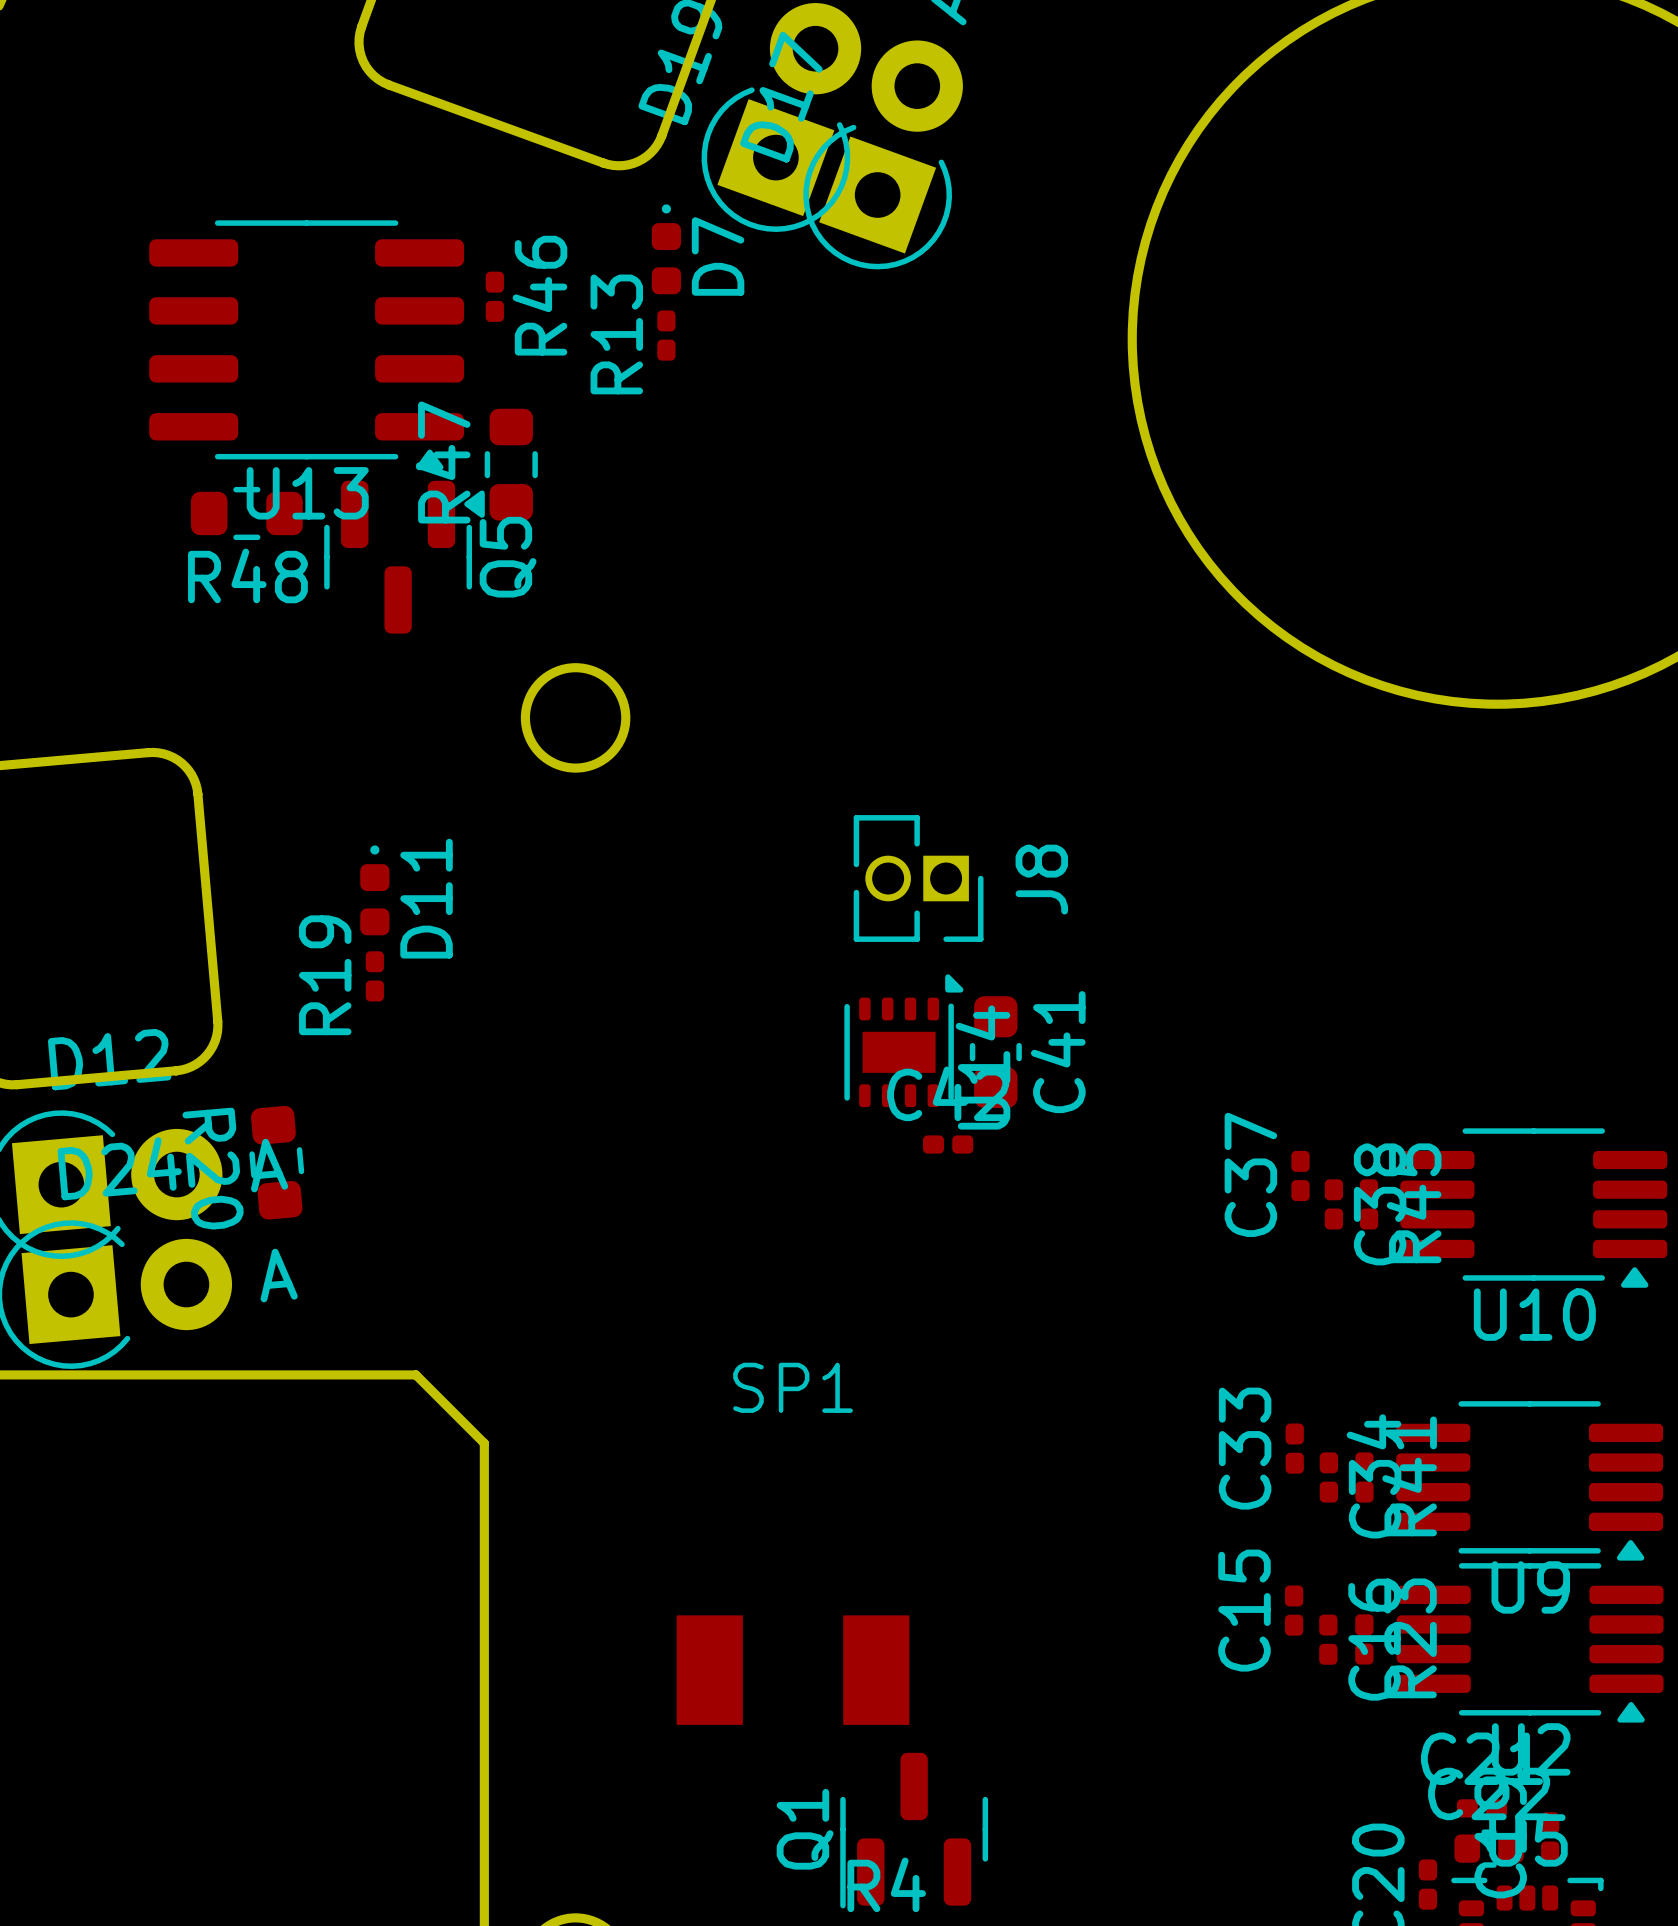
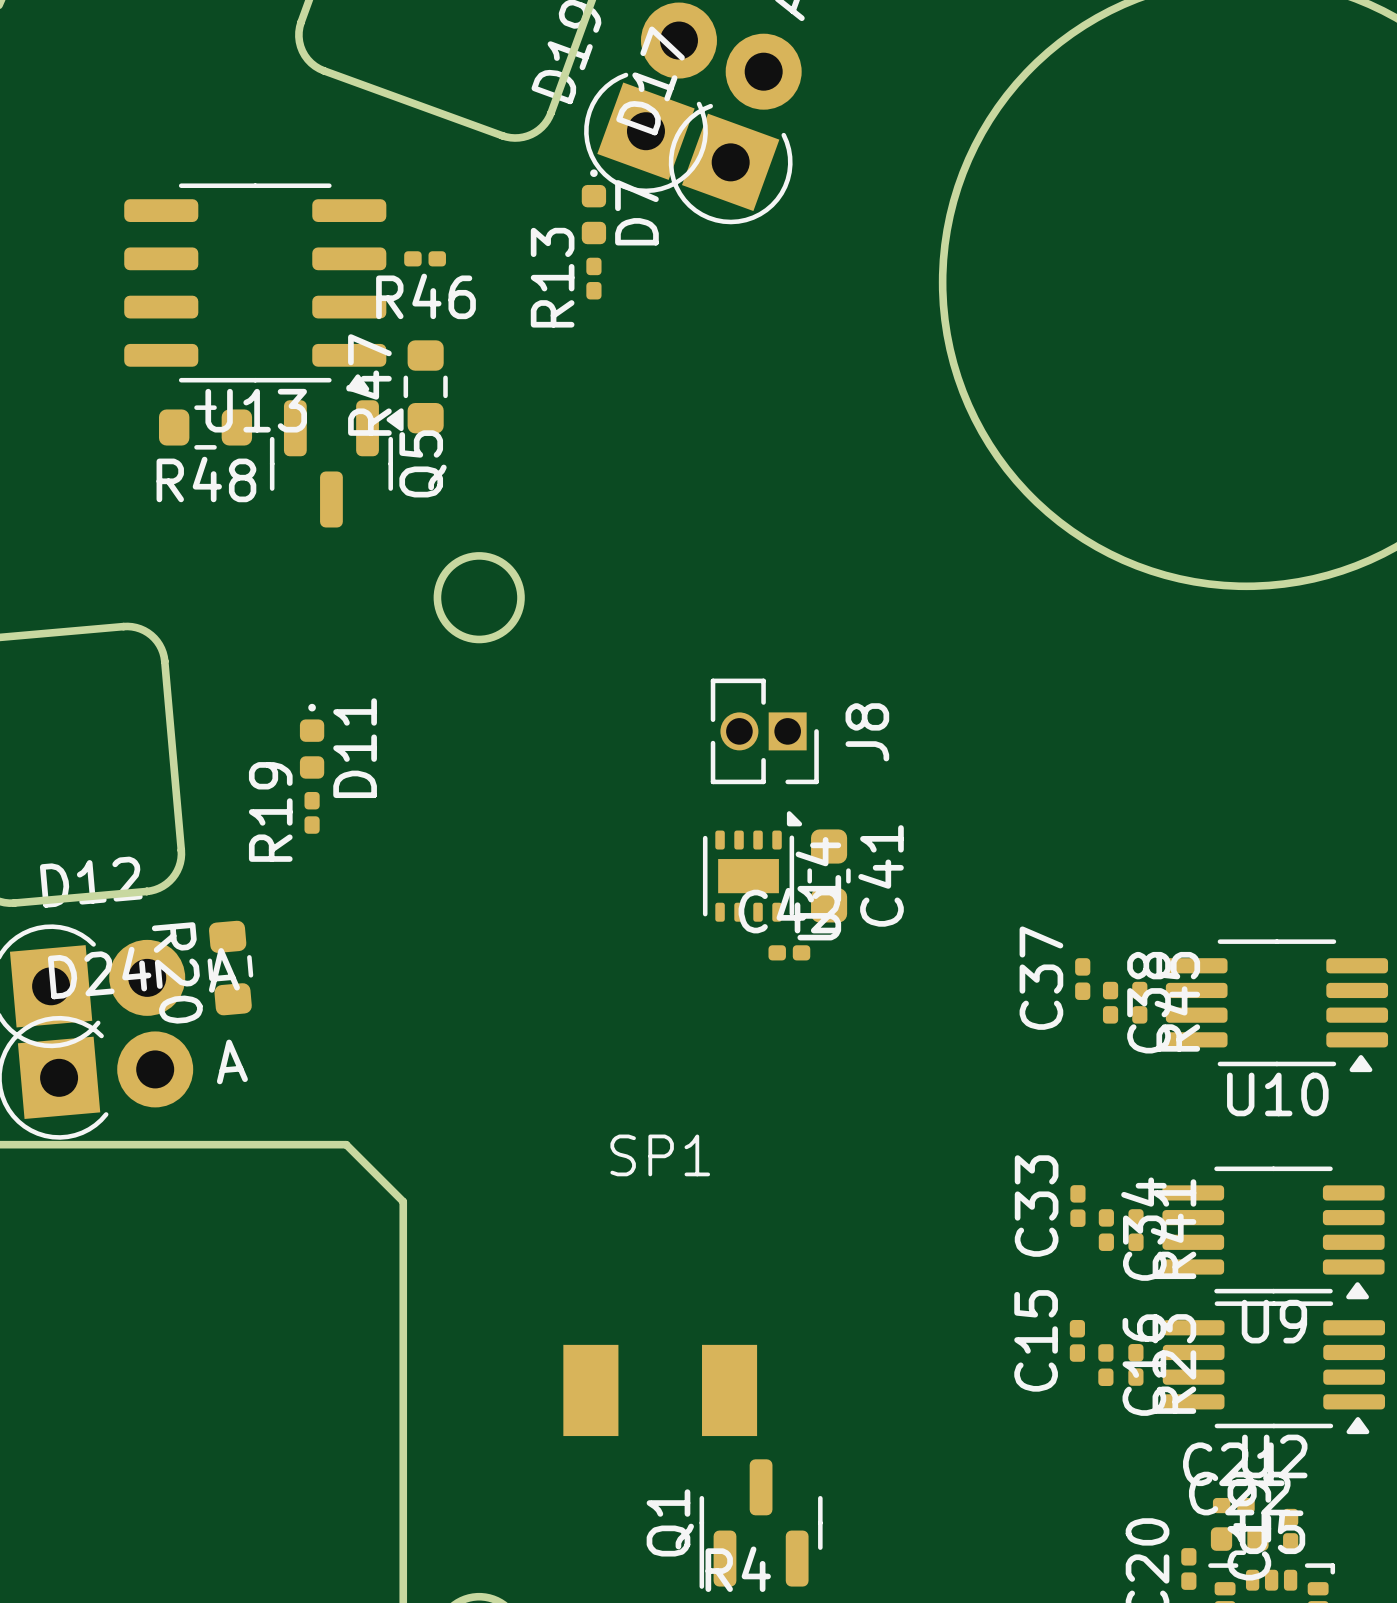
D7 position: (666, 249) -> (593, 206)
R46 rotation: 0° (494, 296) -> 90° clockwise (425, 258)
R13 position: (666, 335) -> (593, 278)

